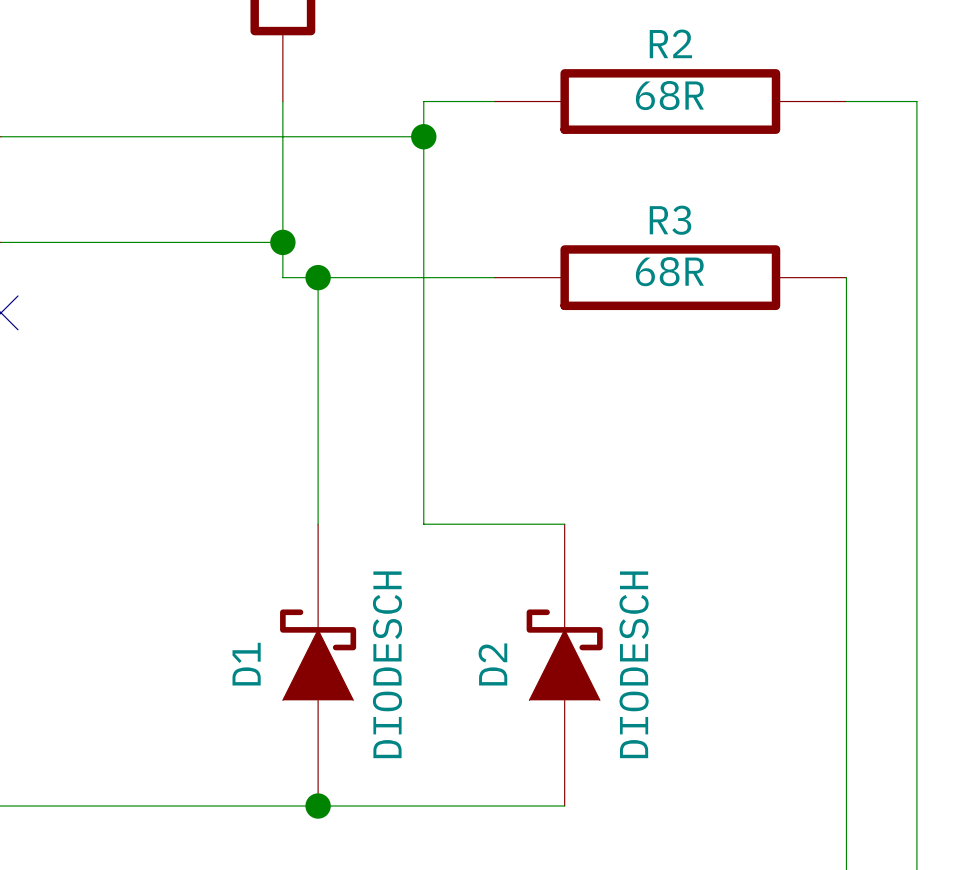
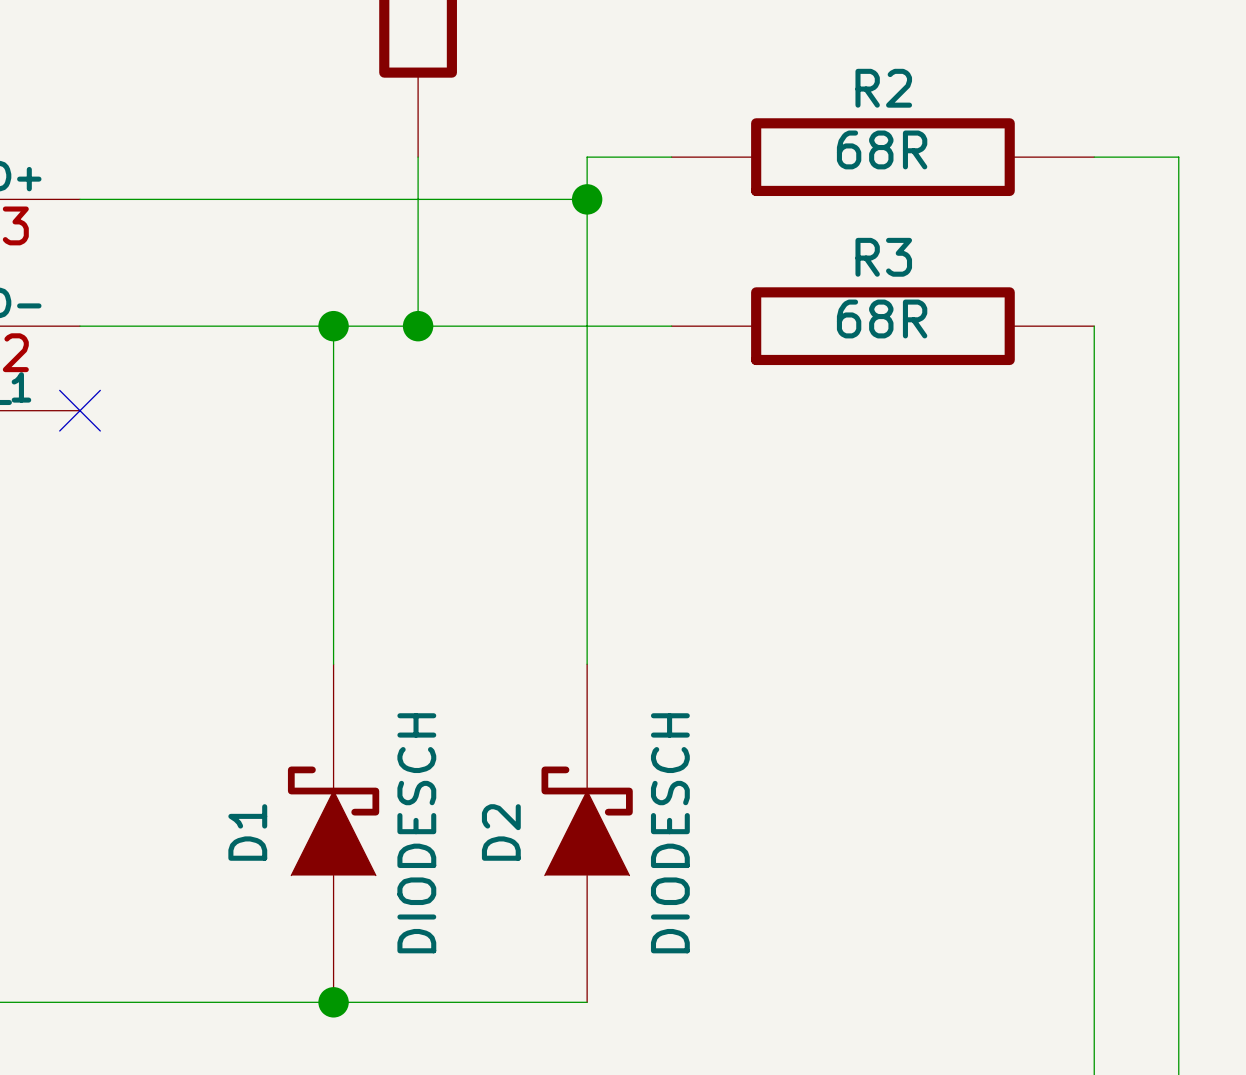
wire: none -> (333, 326) (333, 664)
wire: (282, 242) (282, 277) (494, 277) -> (418, 326) (671, 326)
wire: none -> (1094, 326) (1094, 368)
wire: (318, 277) (318, 524) -> none
junction position: (318, 277) -> (333, 326)
R3 position: (670, 277) -> (882, 326)
wire: (423, 524) (564, 524) -> none
D1 position: (318, 665) -> (333, 833)
D2 position: (564, 665) -> (587, 833)
junction position: (318, 806) -> (333, 1002)
wire: (423, 806) (564, 806) -> none

